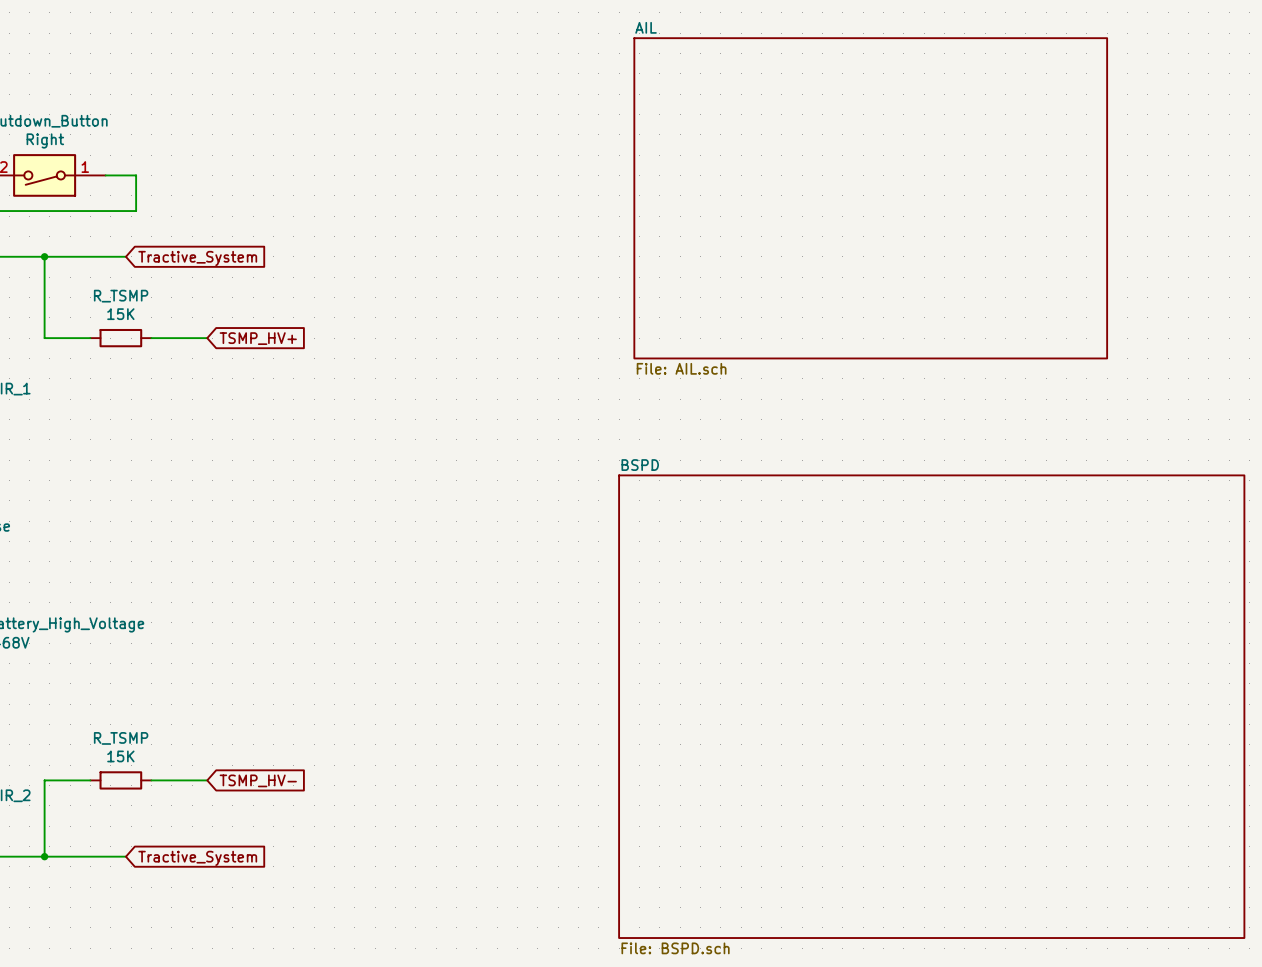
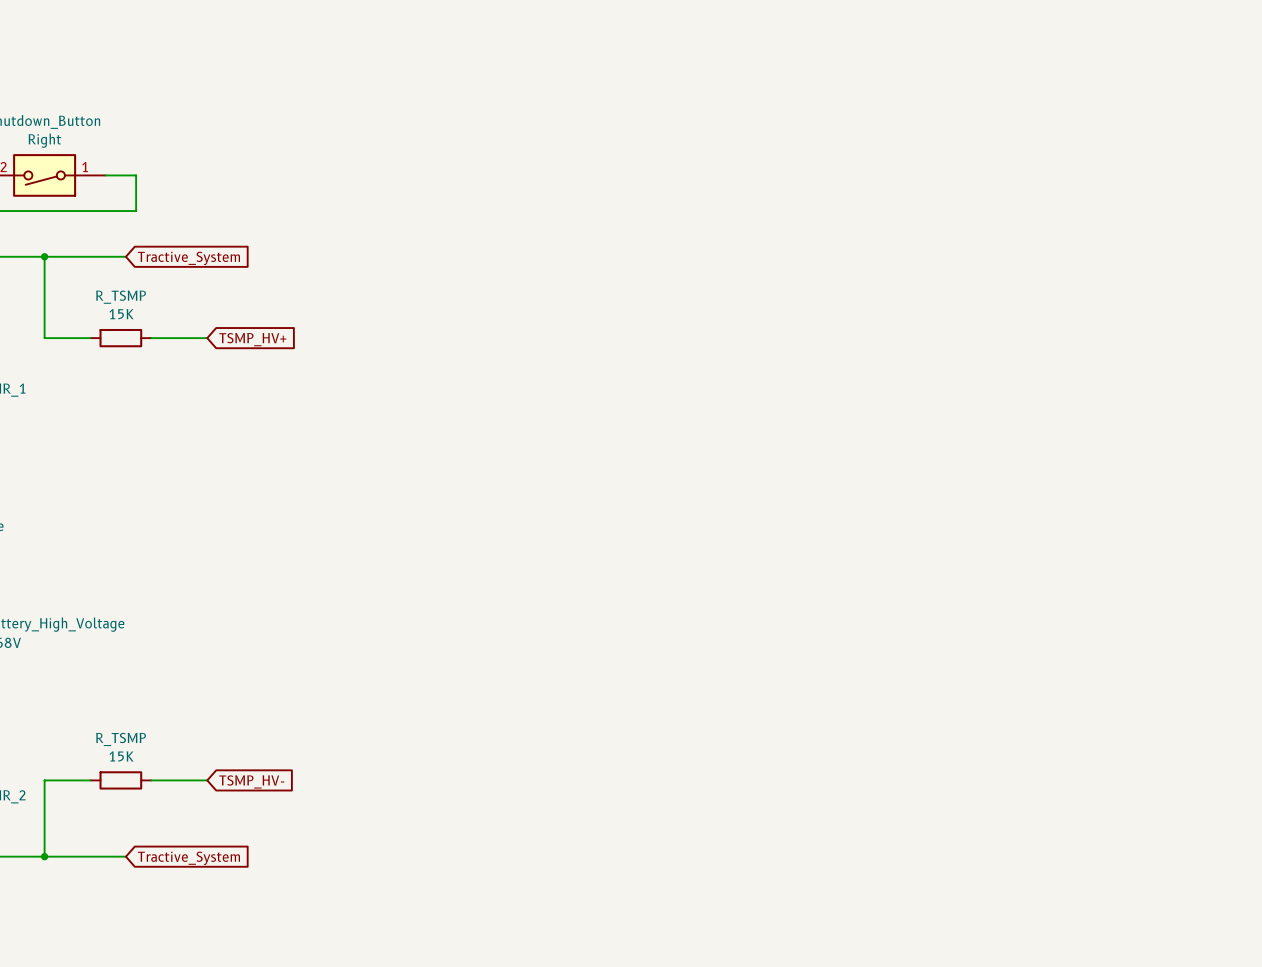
sheet AIL: File: AIL.sch (870, 198) -> none
sheet BSPD: File: BSPD.sch (931, 706) -> none

